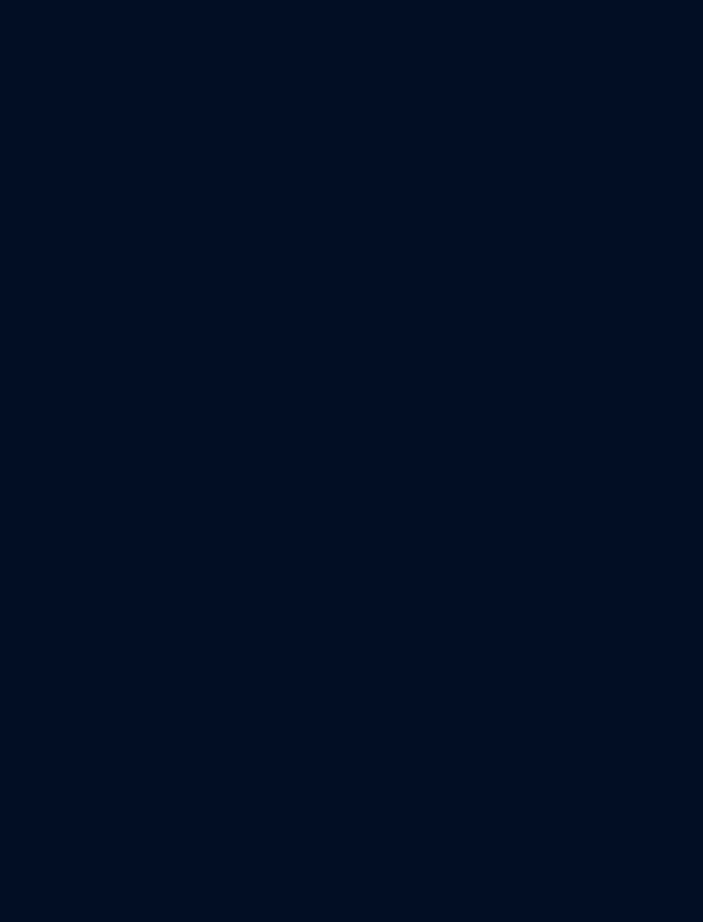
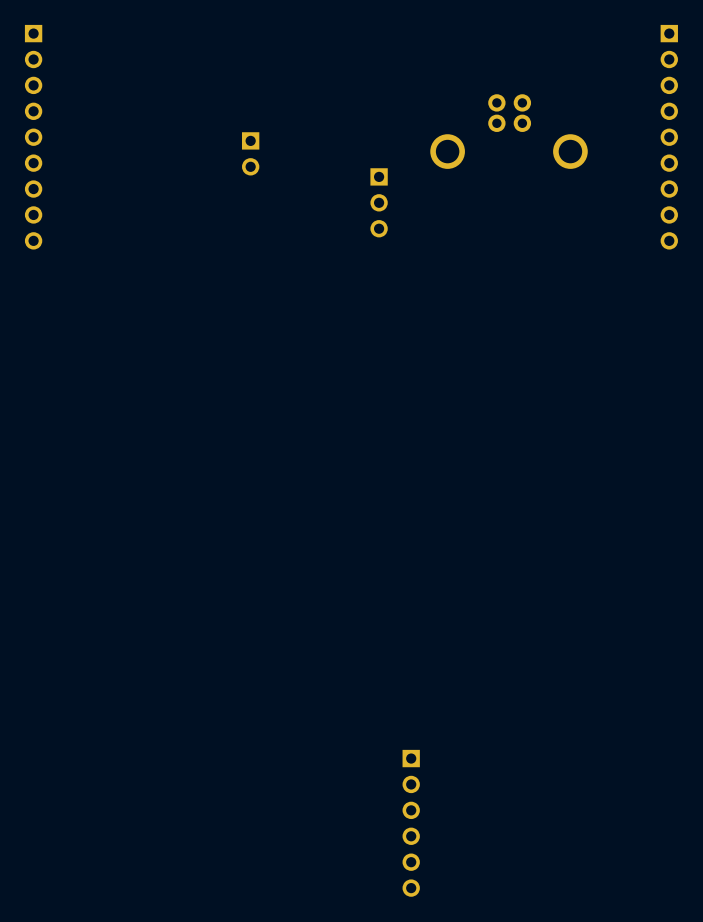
part: none -> (509, 131)
part: none -> (33, 137)
part: none -> (669, 137)
part: none -> (250, 153)
part: none -> (379, 202)
part: none -> (411, 823)

